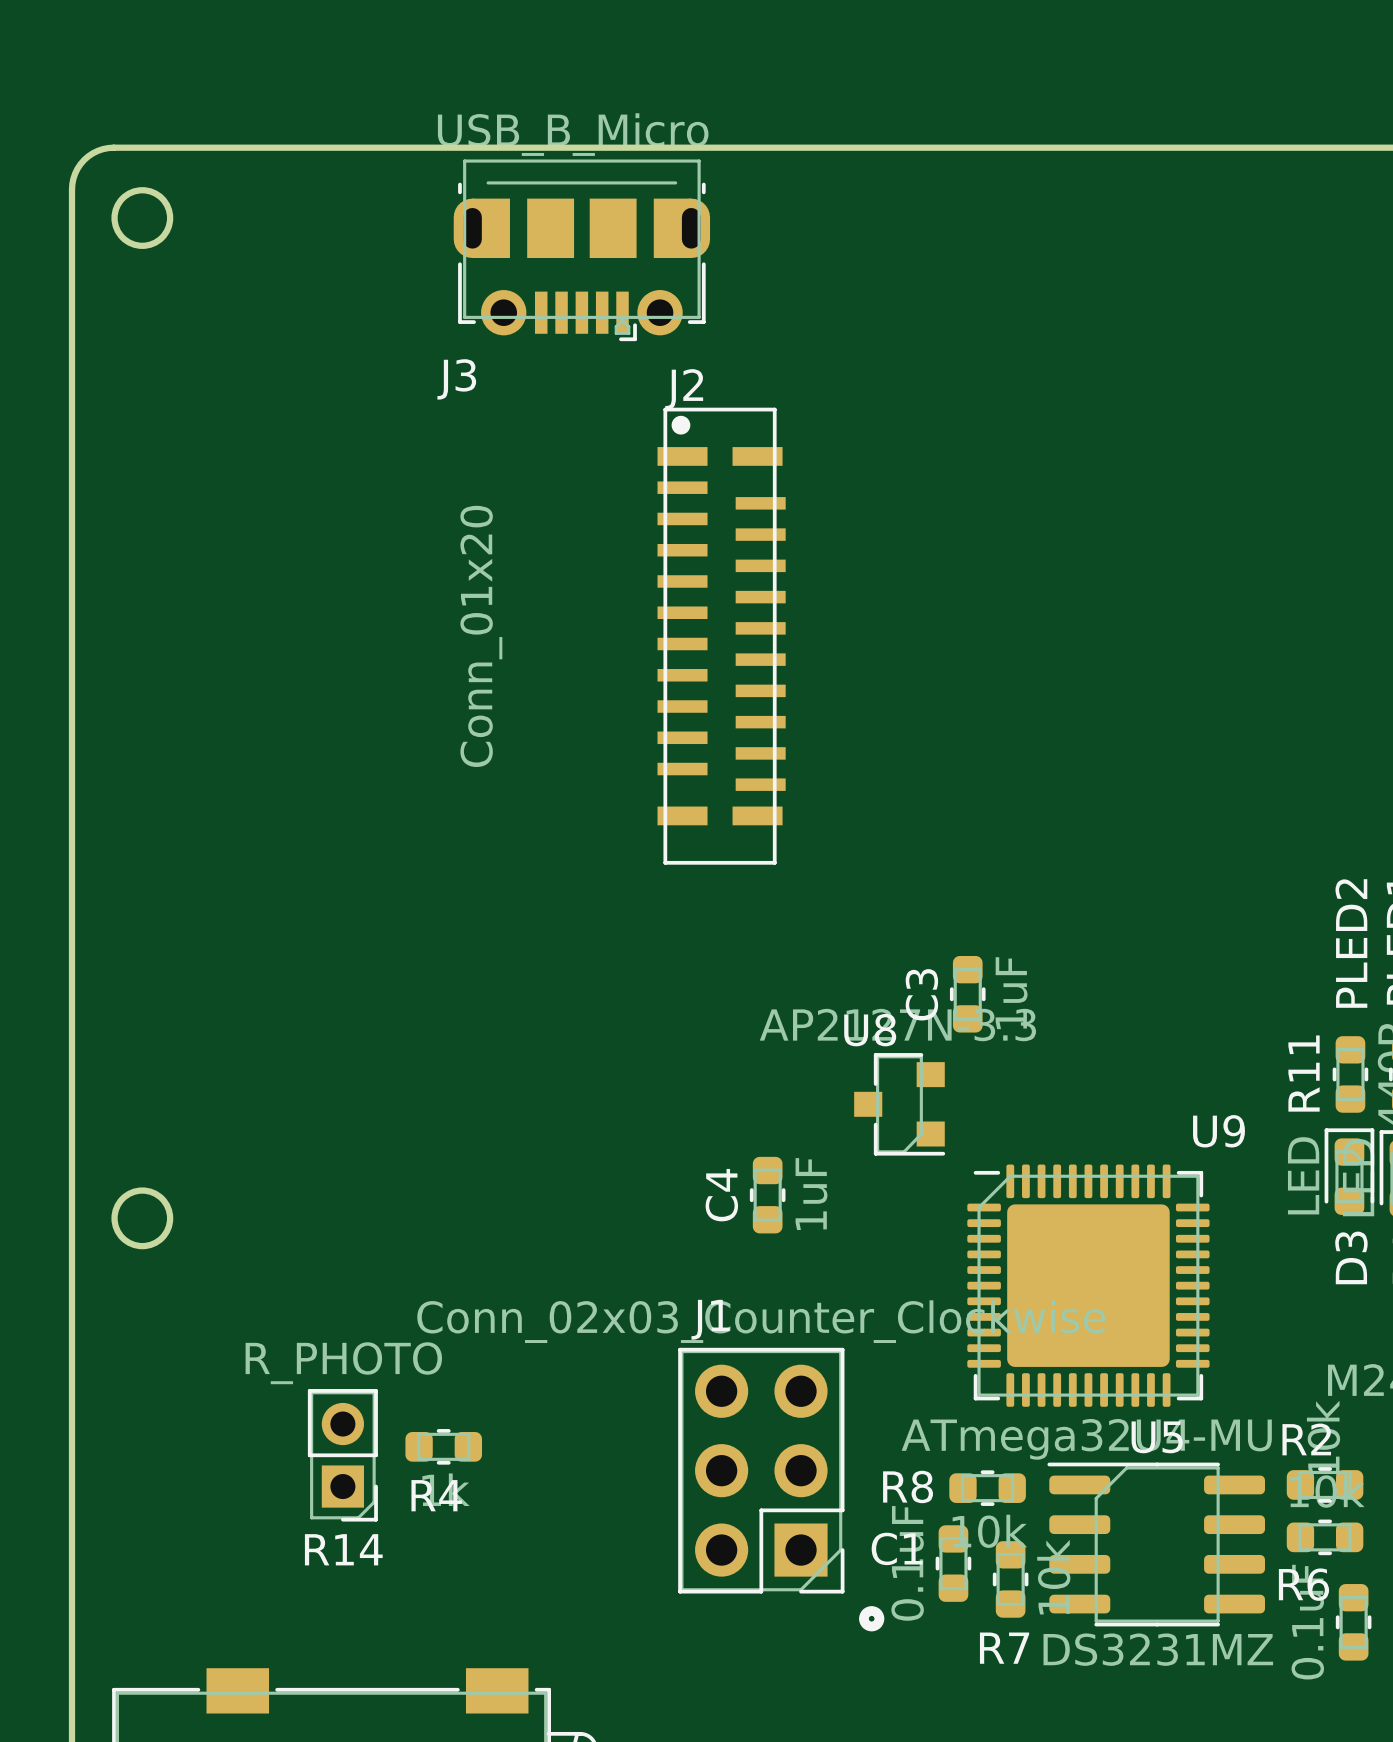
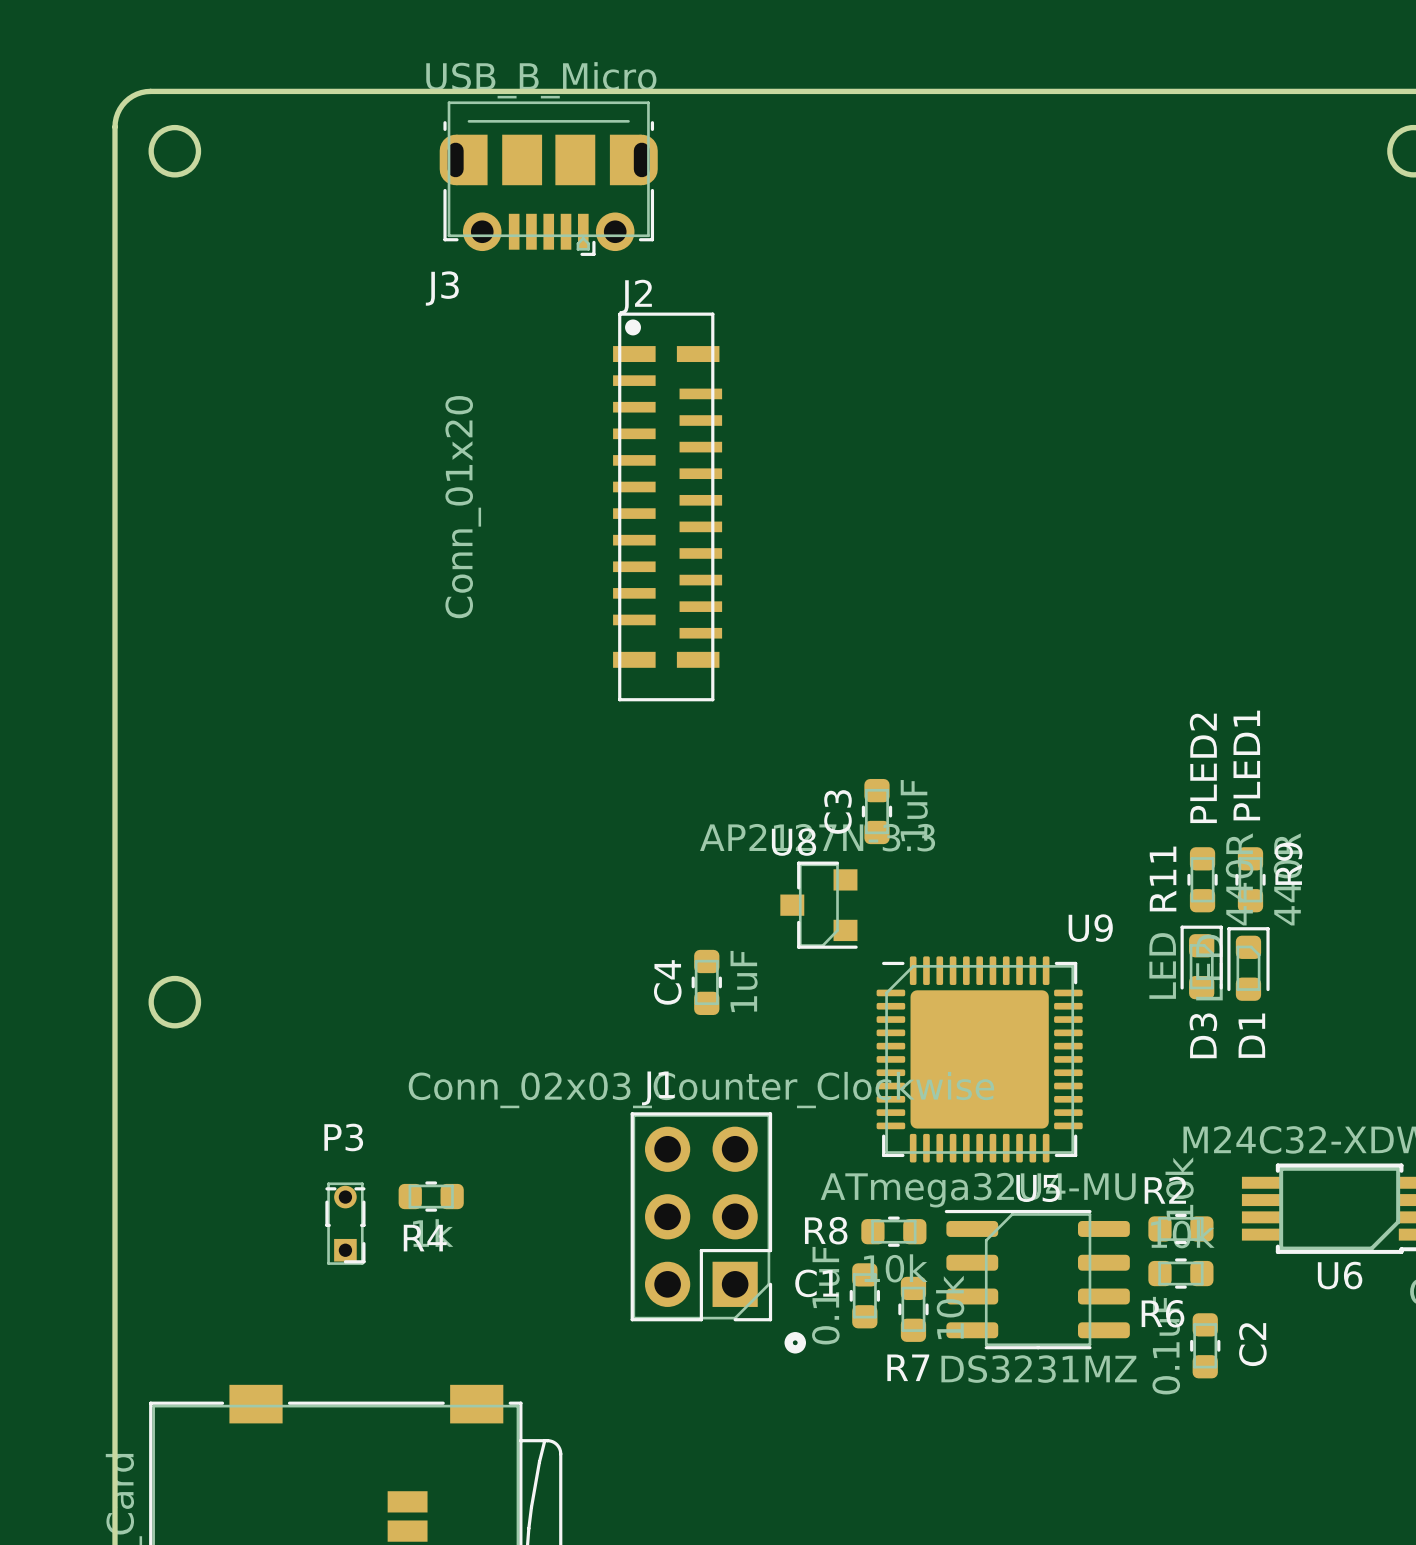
R14: R_PHOTO (342, 1455) -> none
part: none -> P3 (345, 1223)

